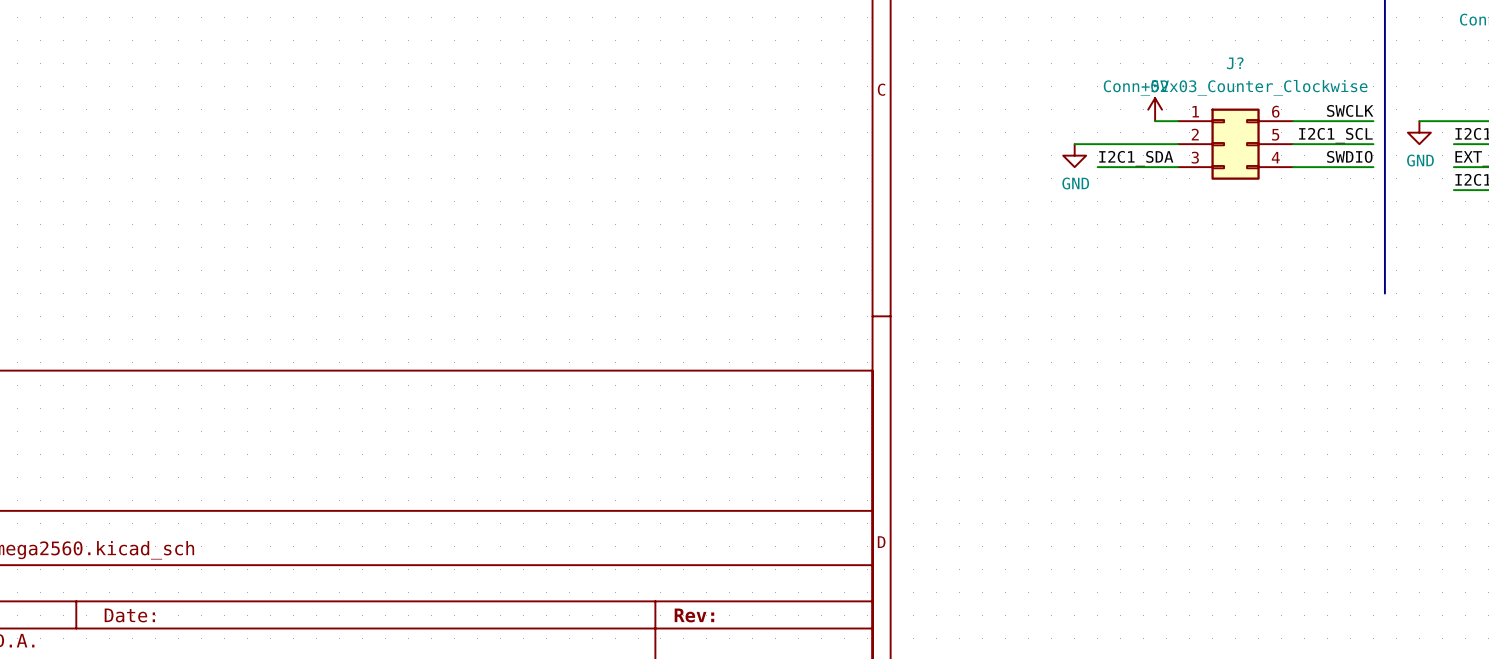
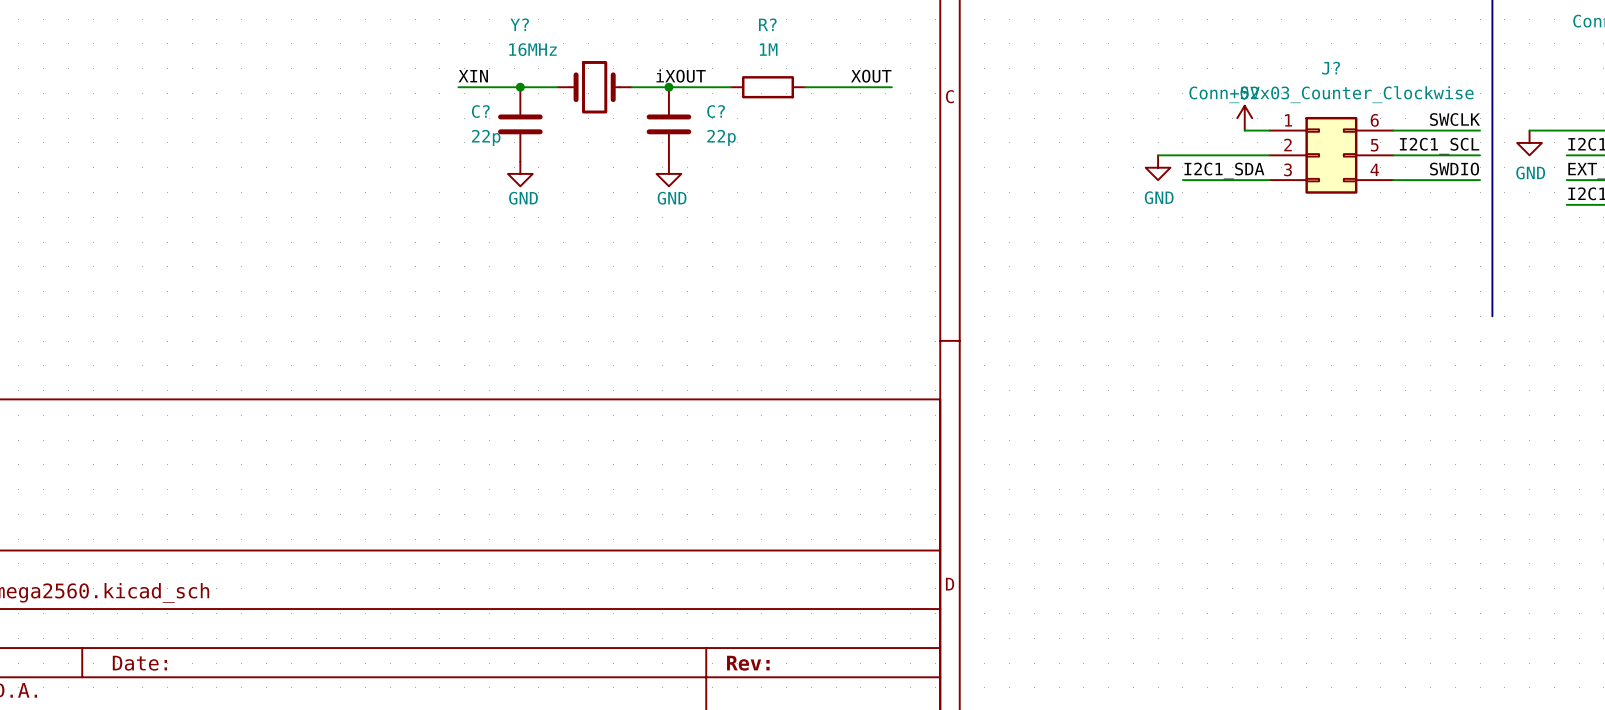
label: none -> XIN (473, 76)
label: none -> iXOUT (681, 76)
label: none -> XOUT (871, 76)
wire: none -> (458, 87) (557, 87)
junction: none -> (520, 87)
Y?: none -> 16MHz (594, 87)
wire: none -> (631, 87) (730, 87)
junction: none -> (668, 87)
R?: none -> 1M (768, 87)
wire: none -> (805, 87) (891, 87)
C?: none -> 22p (520, 124)
C?: none -> 22p (668, 124)
power symbol: none -> GND (520, 173)
power symbol: none -> GND (668, 173)

